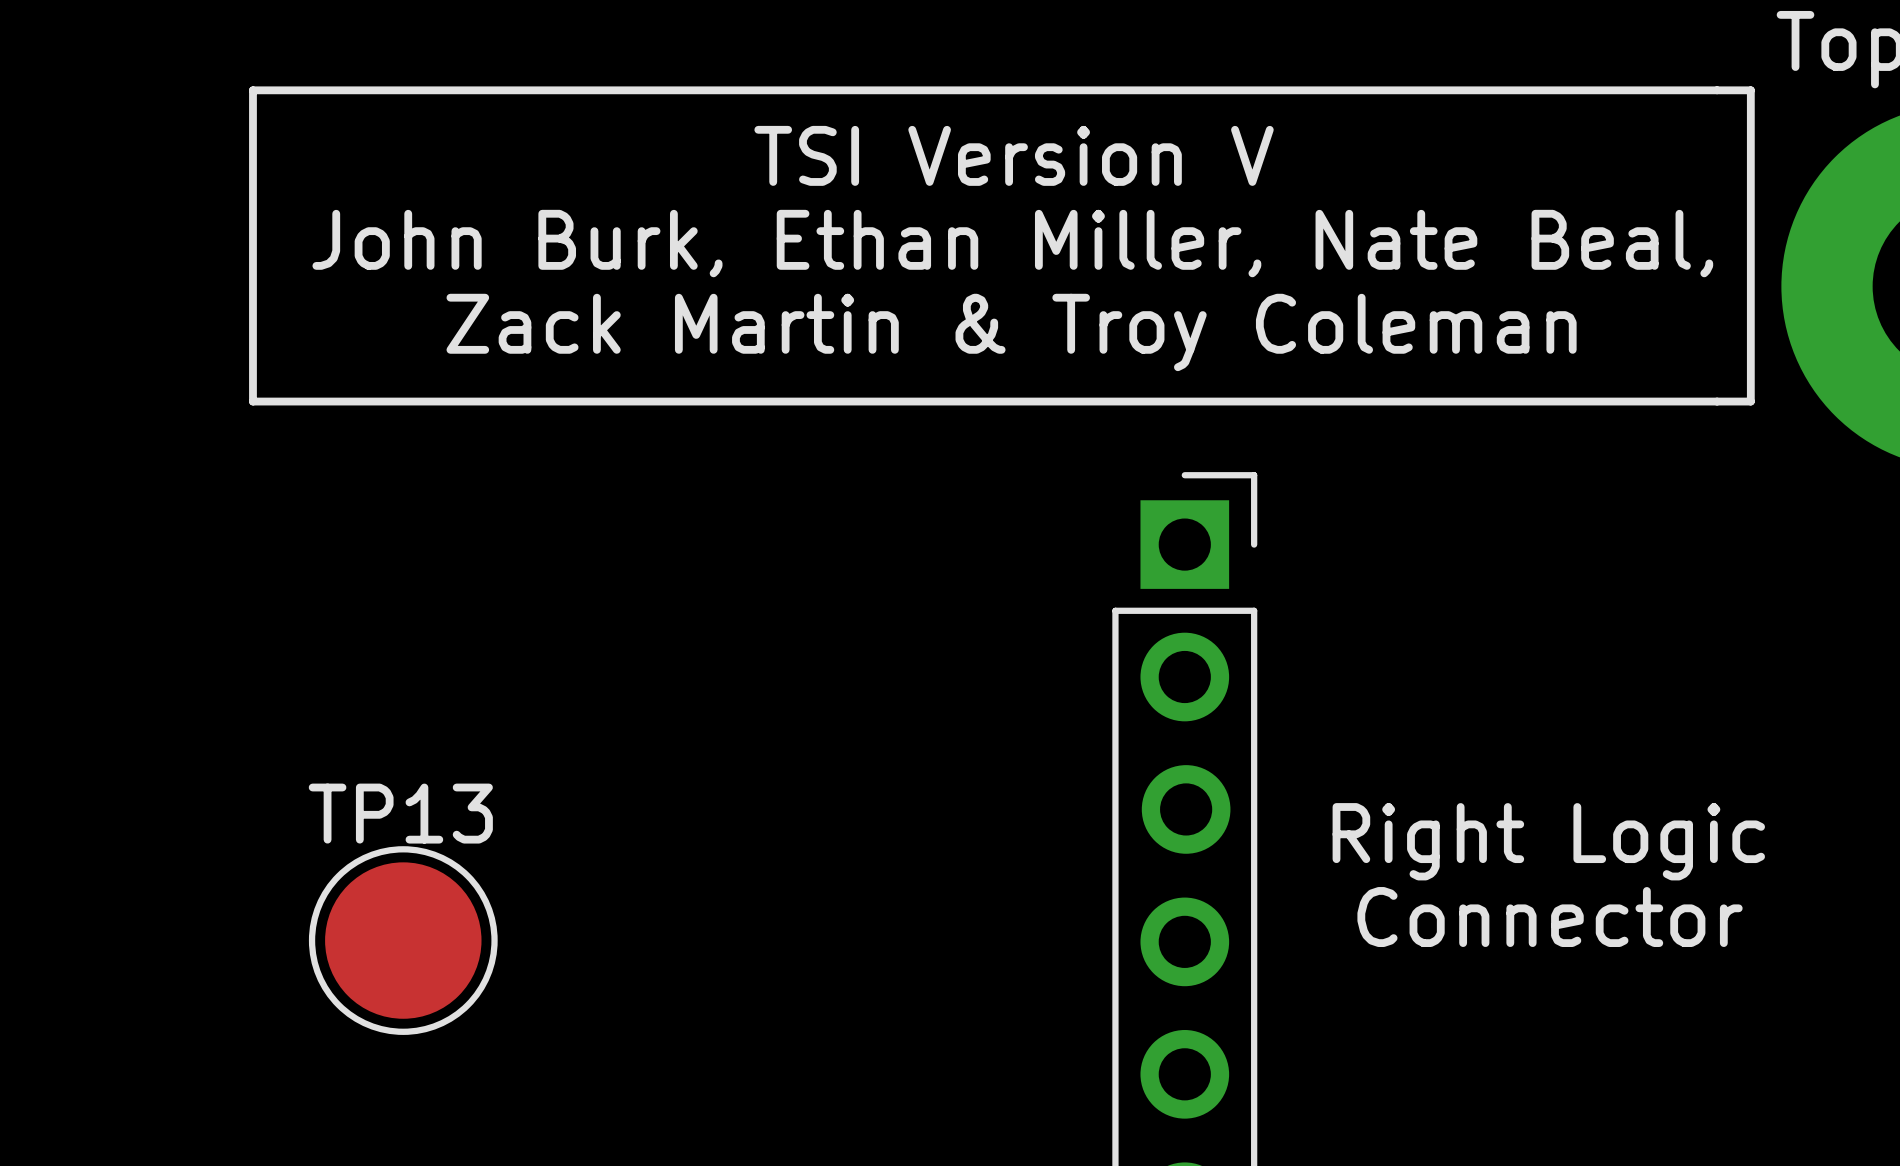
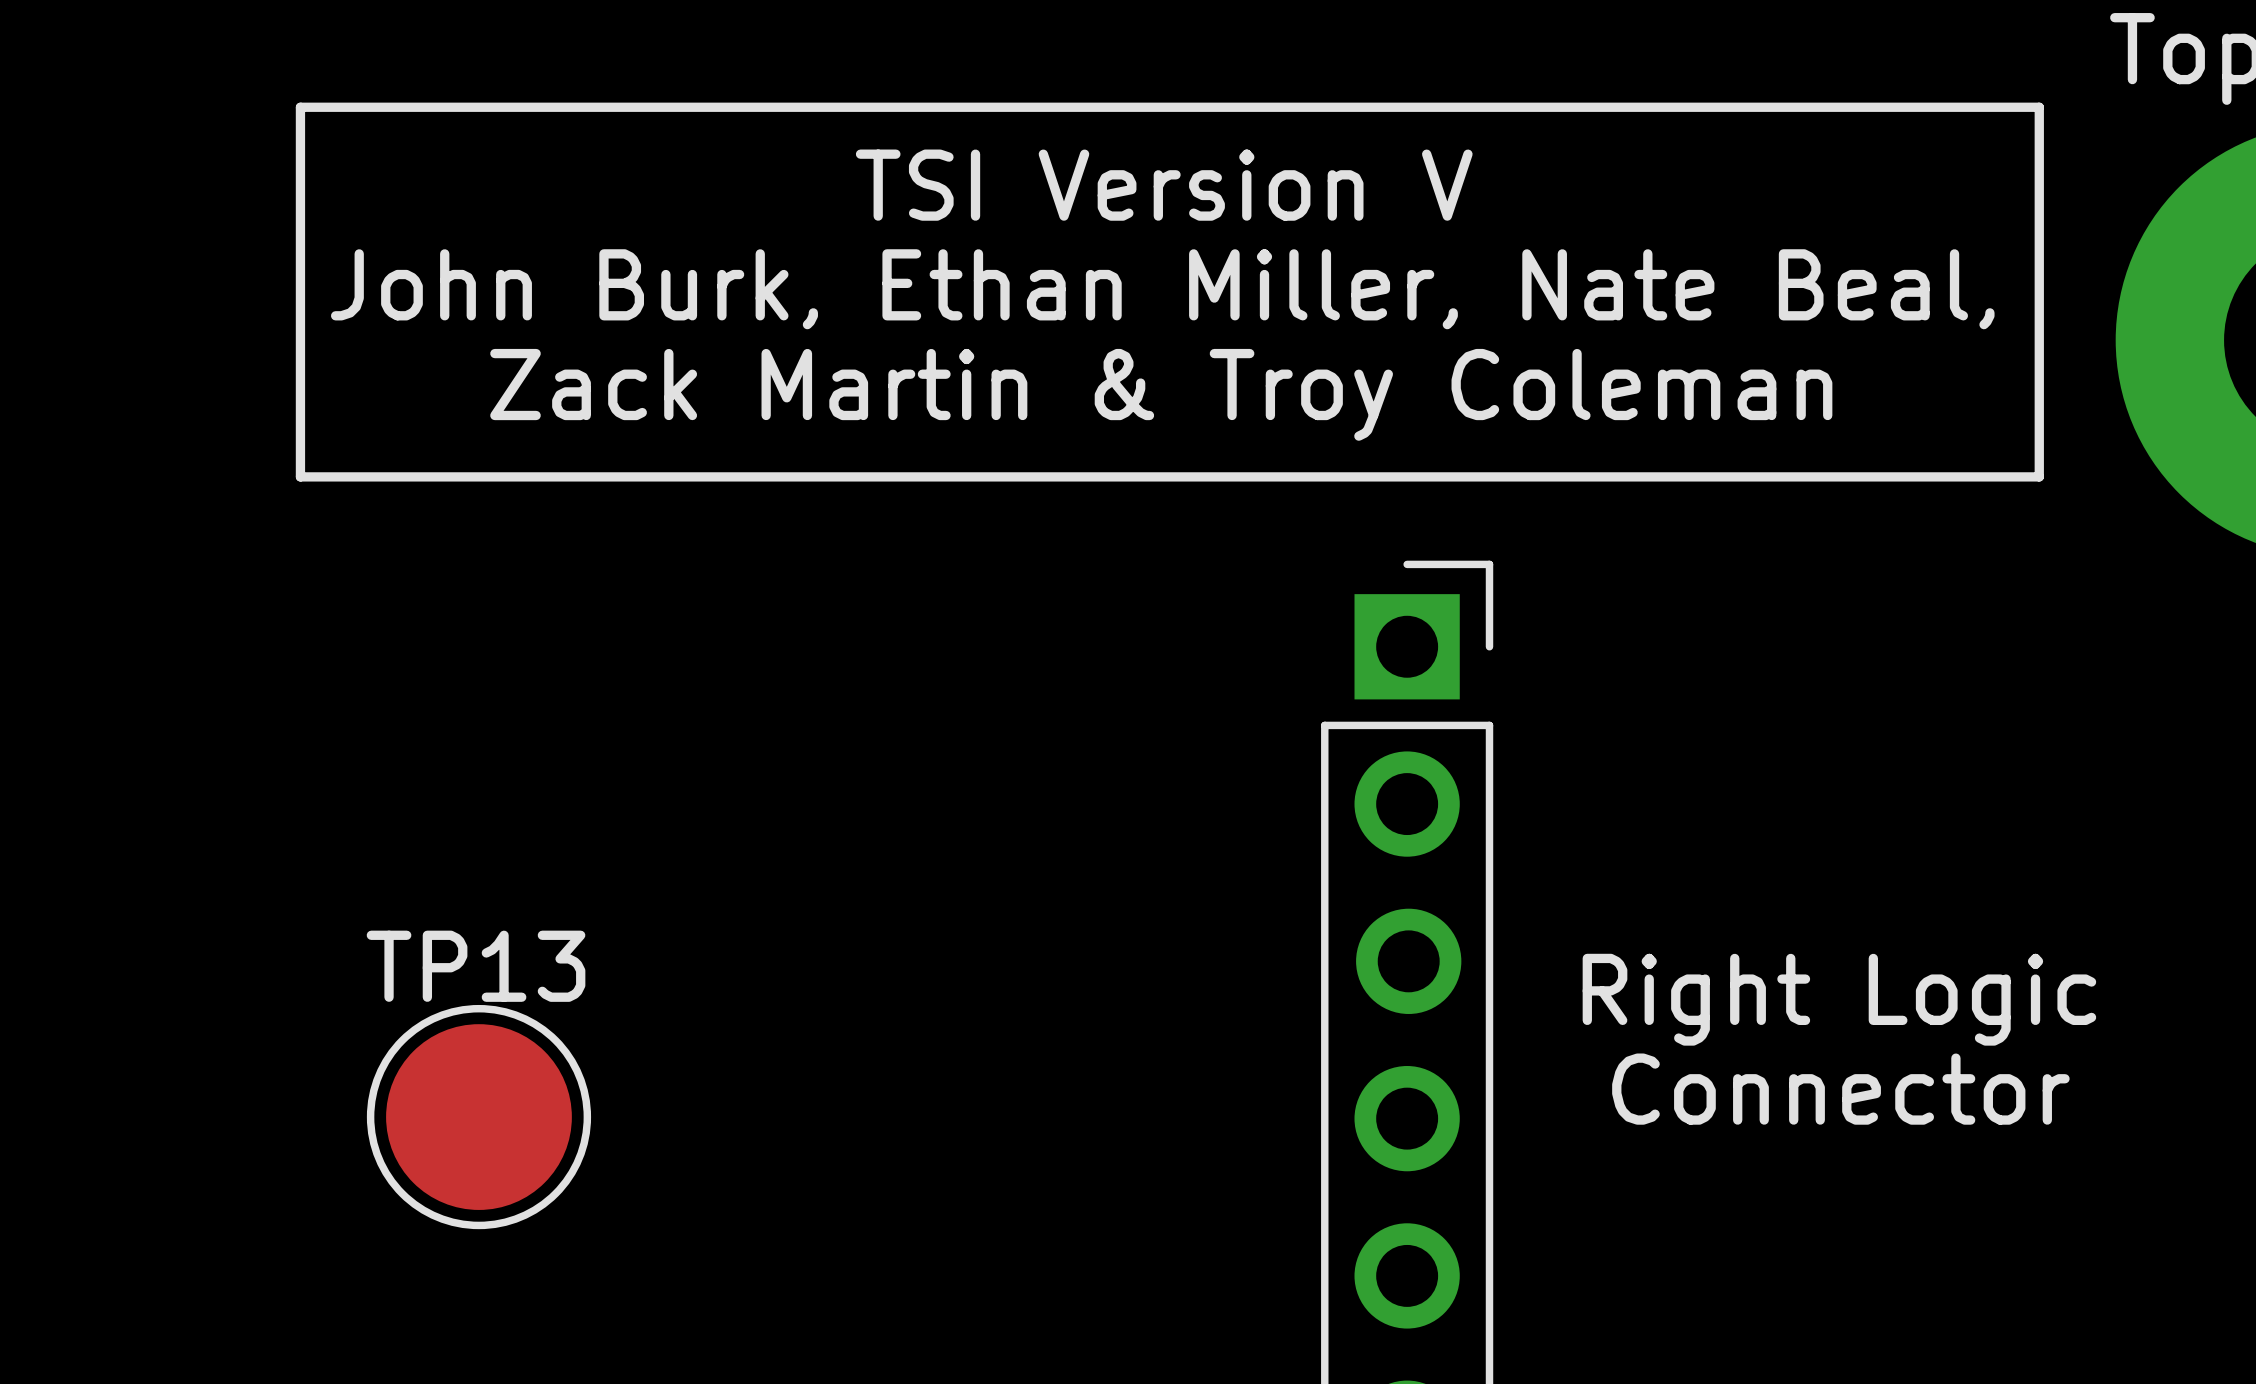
line: (1717, 90) (1750, 90) (1750, 401) (1717, 401) -> (2039, 107) (2039, 476)
text position: TSI Version V (1014, 155) -> TSI Version V (1164, 185)
text position: John Burk, Ethan Miller, Nate Beal, (1012, 243) -> John Burk, Ethan Miller, Nate Beal, (1162, 289)
text position: Zack Martin & Troy Coleman (1011, 332) -> Zack Martin & Troy Coleman (1161, 394)

